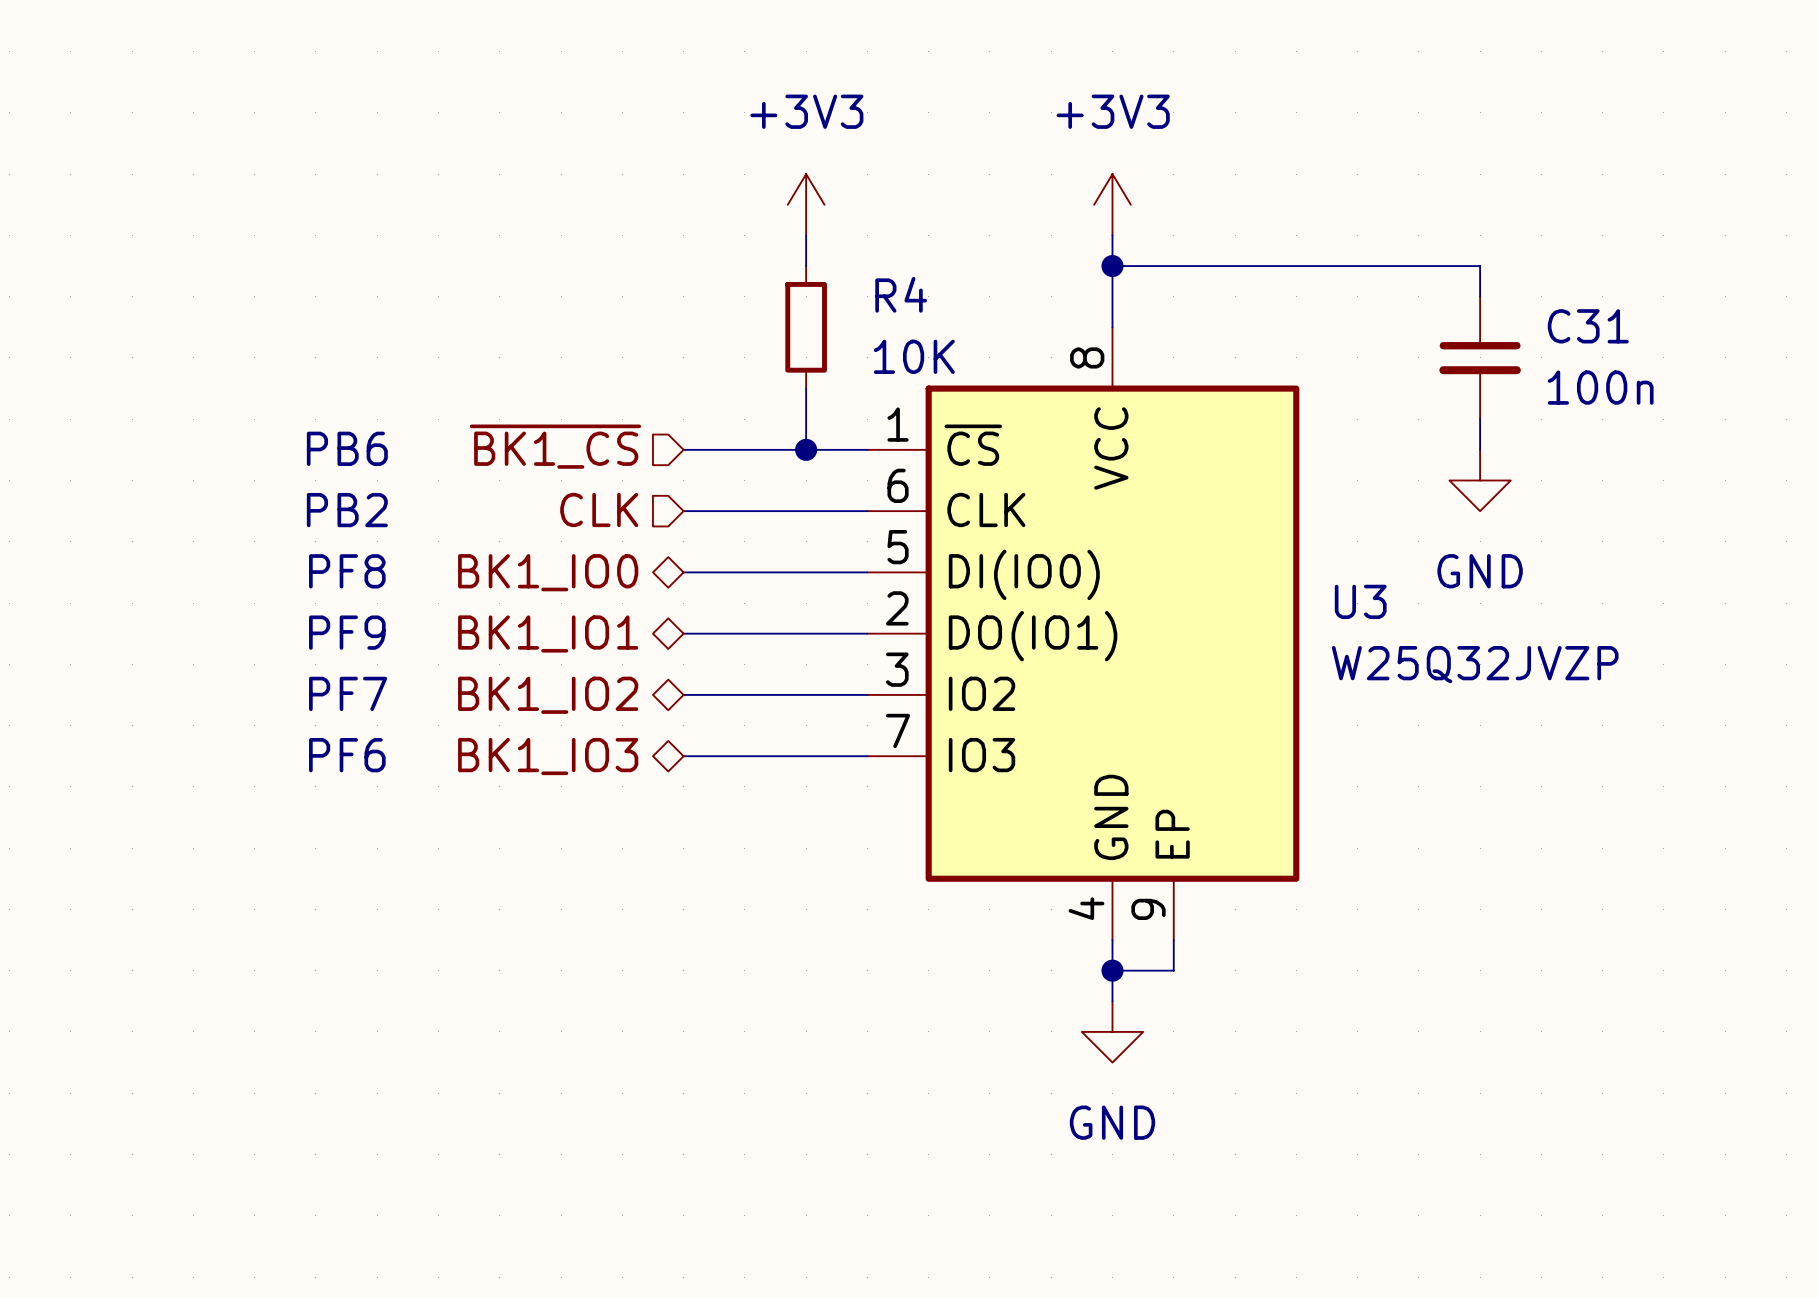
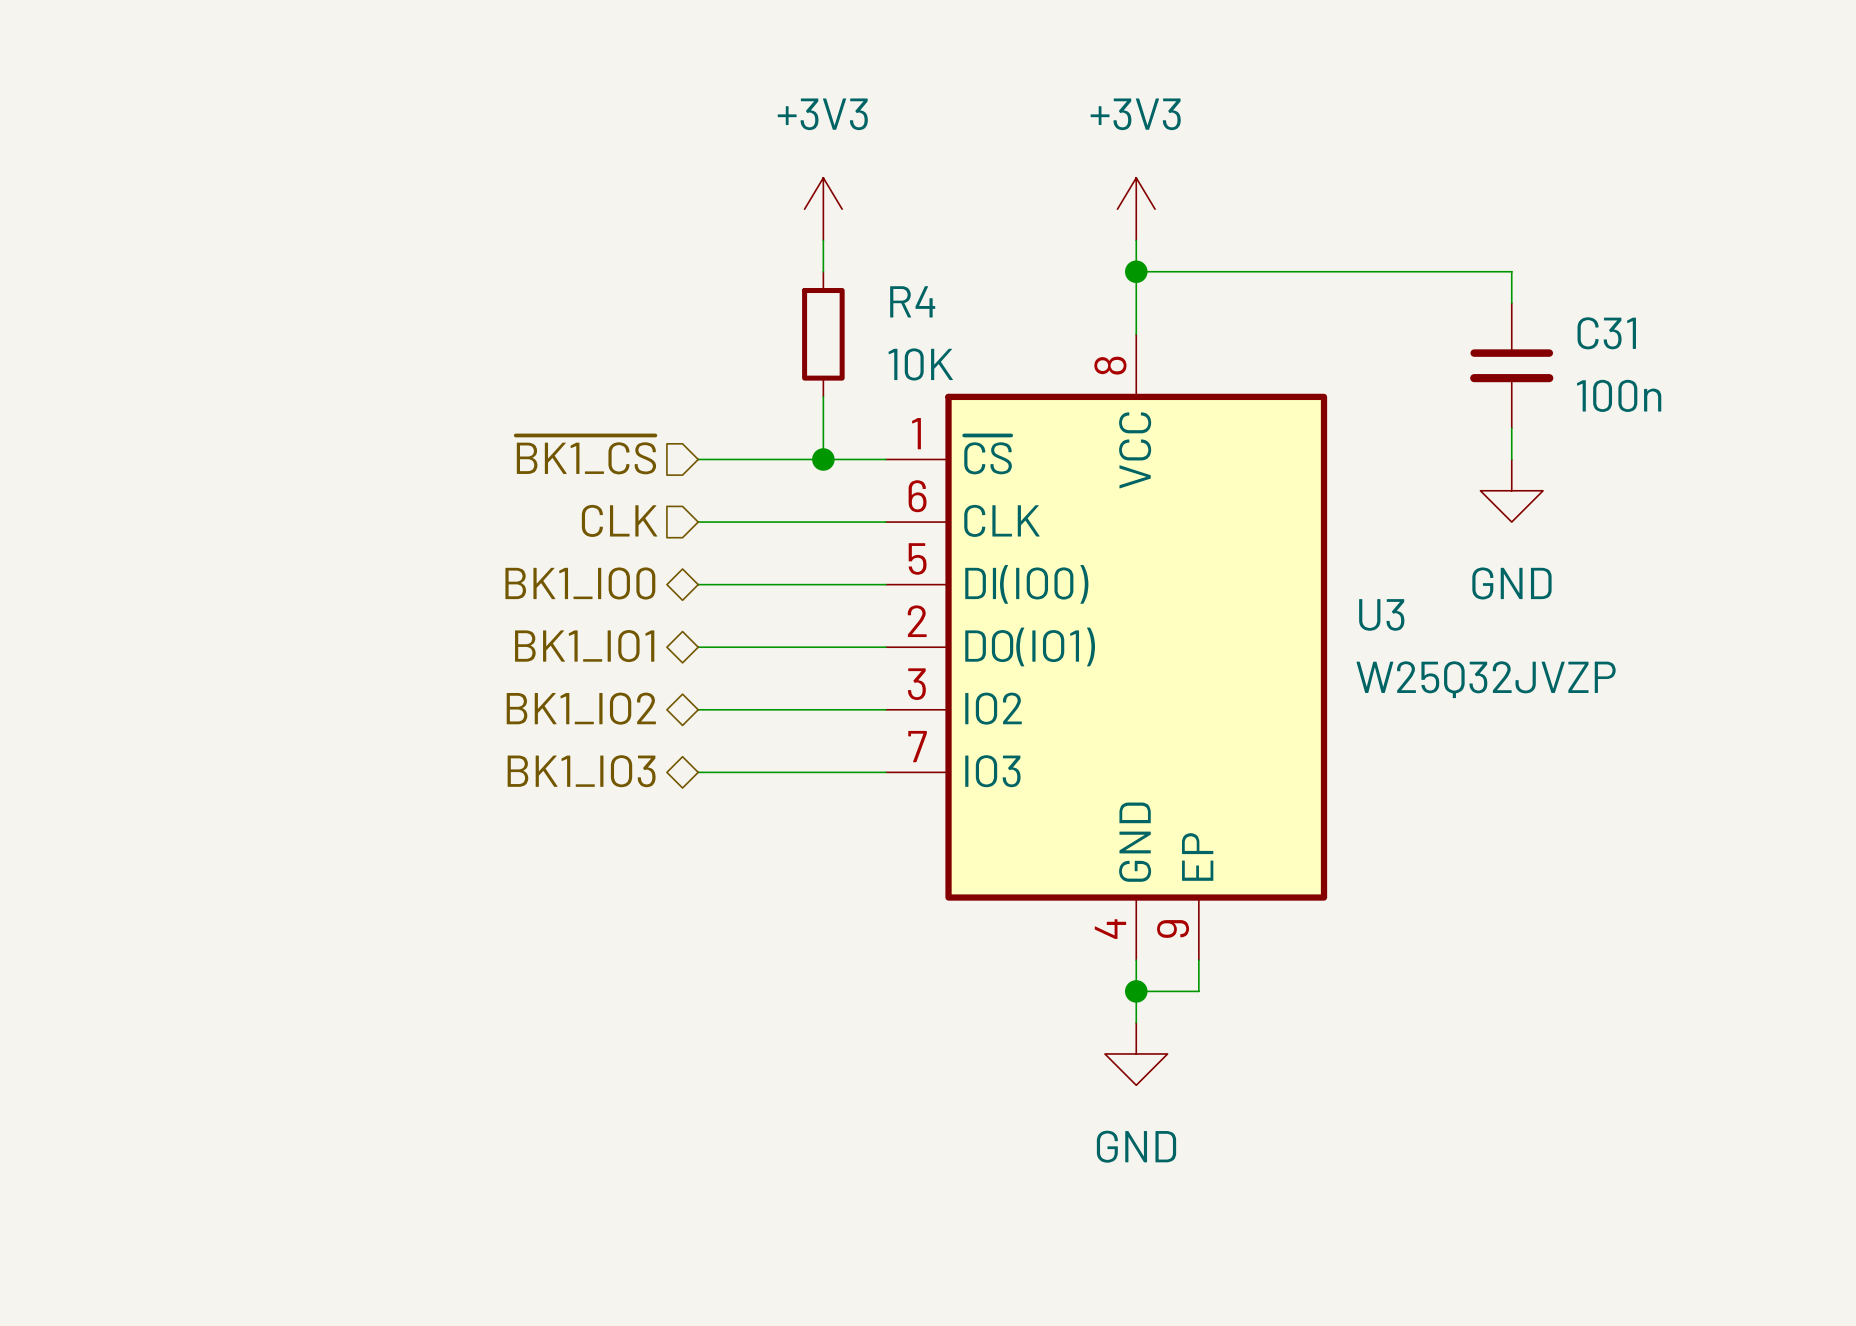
text: PB6 (347, 448) -> none
text: PB2 (347, 510) -> none
text: PF8 (347, 571) -> none
text: PF9 (347, 632) -> none
text: PF7 (348, 693) -> none
text: PF6 (347, 755) -> none

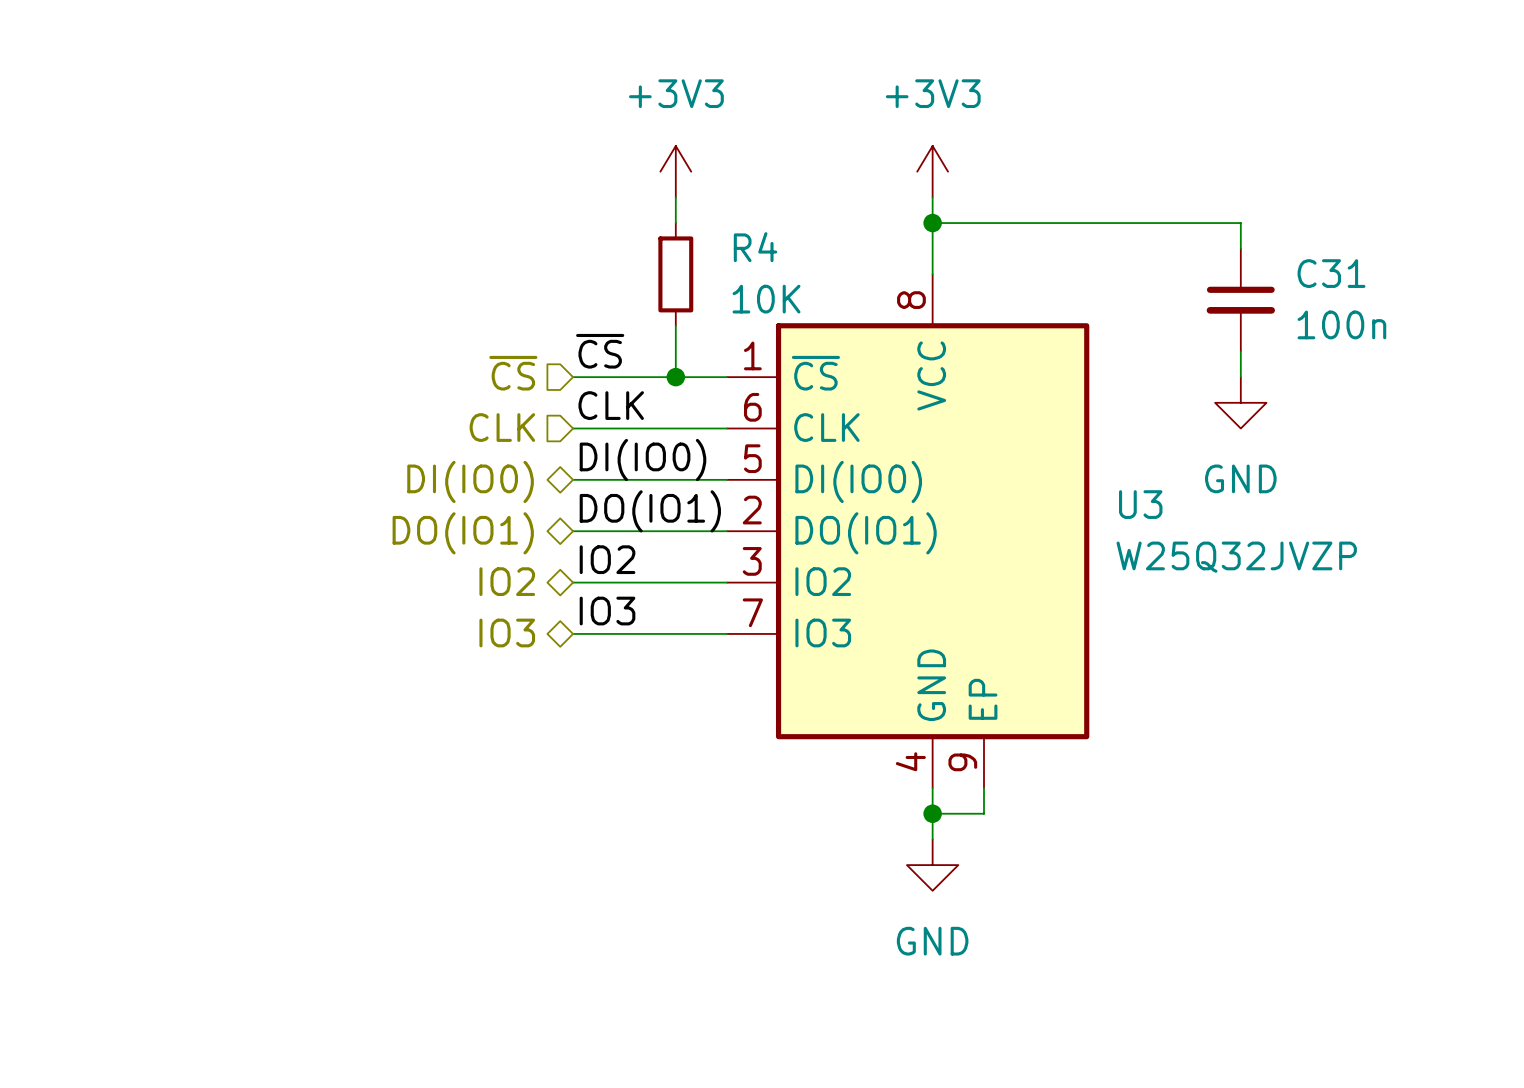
label: none -> ~{CS} (600, 351)
hierarchical label: ~{BK1_CS} (585, 454) -> ~{CS} (513, 373)
label: none -> CLK (611, 405)
label: none -> DI(IO0) (642, 460)
hierarchical label: BK1_IO0 (580, 583) -> DI(IO0) (470, 481)
label: none -> DO(IO1) (650, 511)
hierarchical label: BK1_IO1 (584, 646) -> DO(IO1) (463, 533)
label: none -> IO2 (607, 559)
hierarchical label: BK1_IO2 (581, 708) -> IO2 (507, 581)
label: none -> IO3 (607, 611)
hierarchical label: BK1_IO3 (581, 771) -> IO3 (507, 632)

